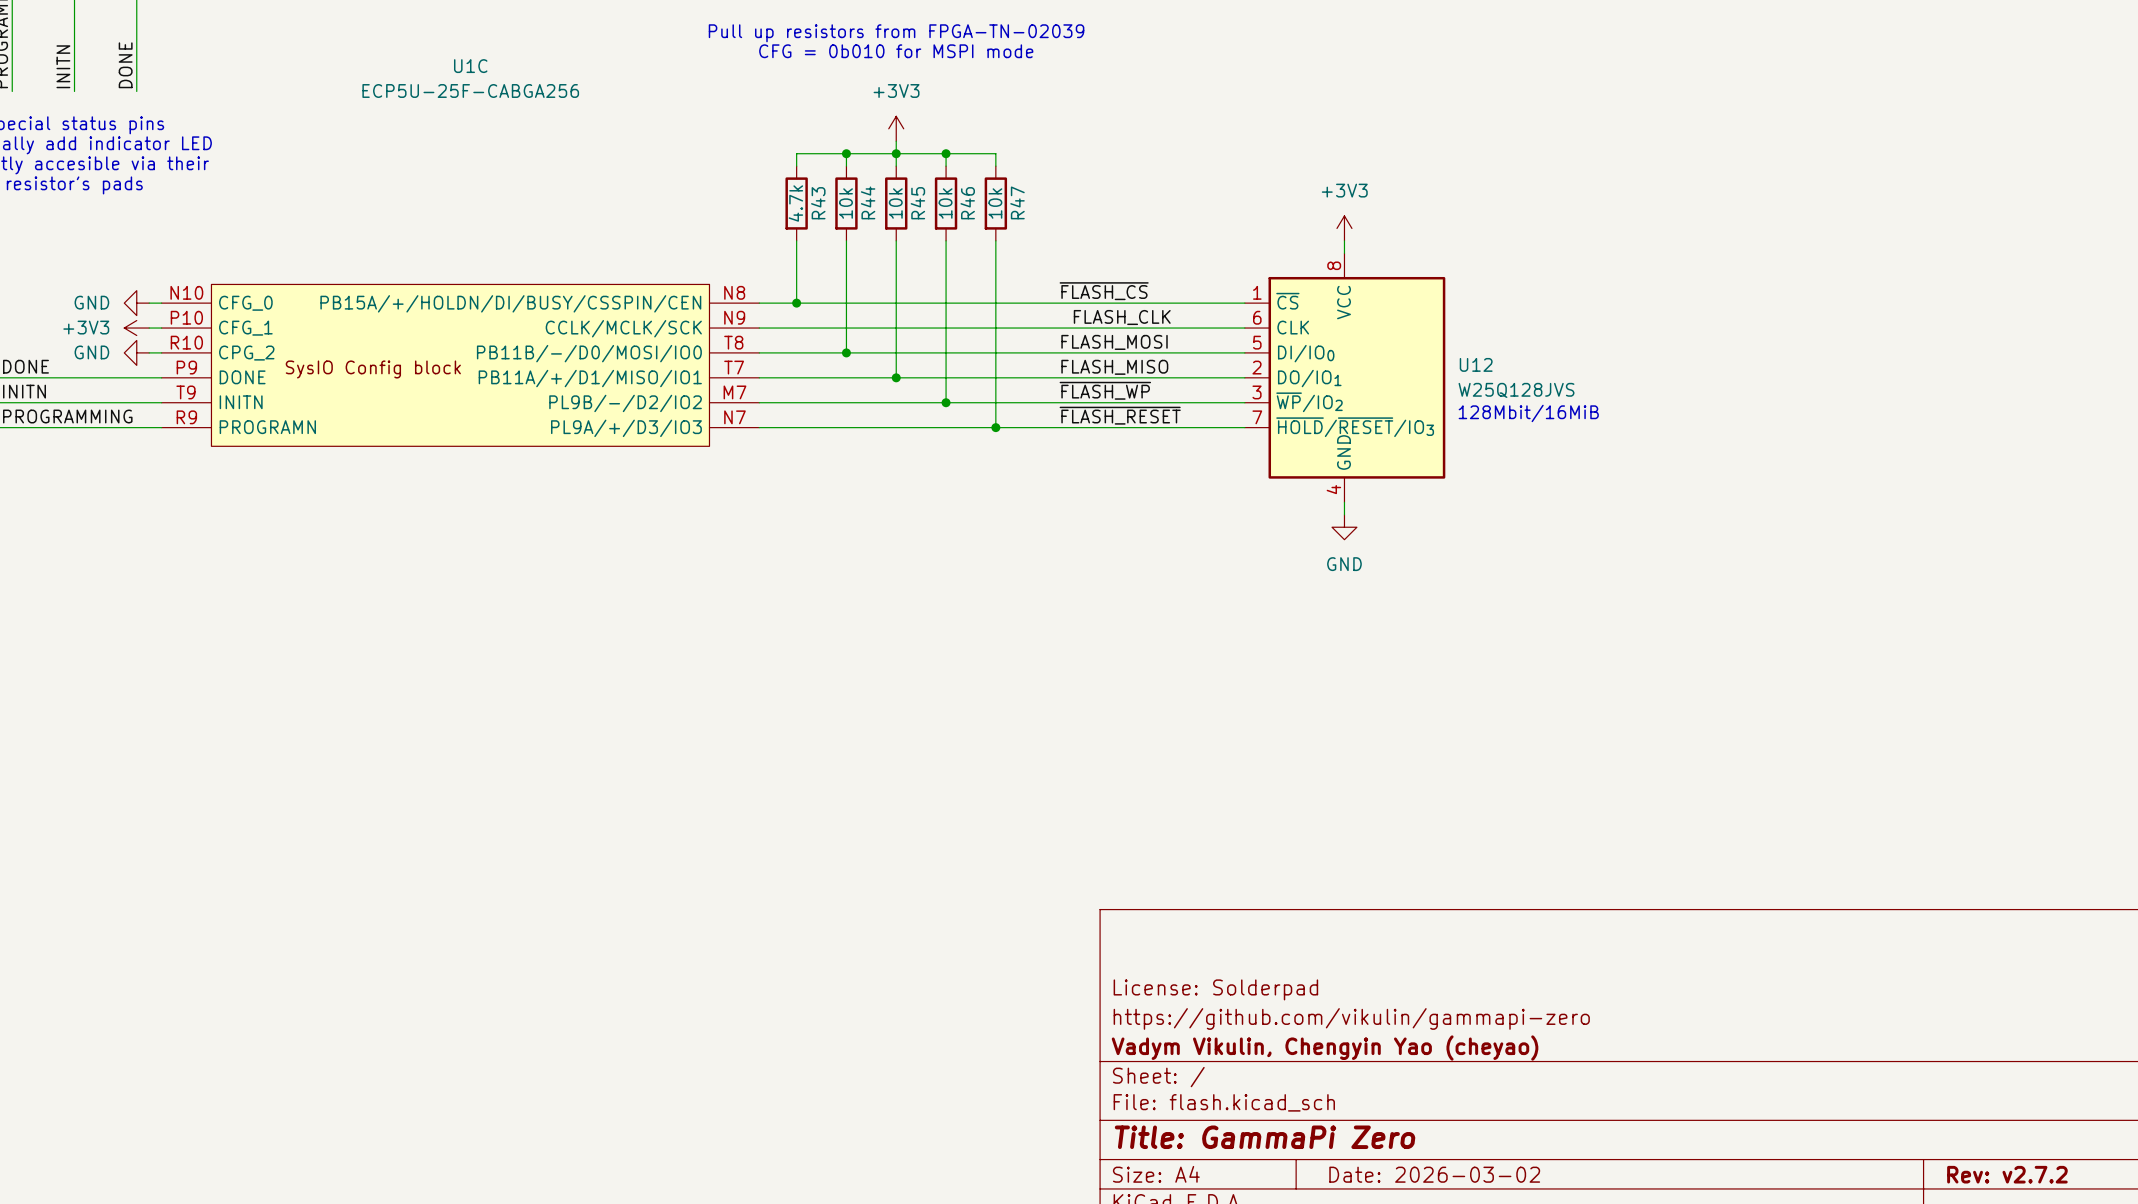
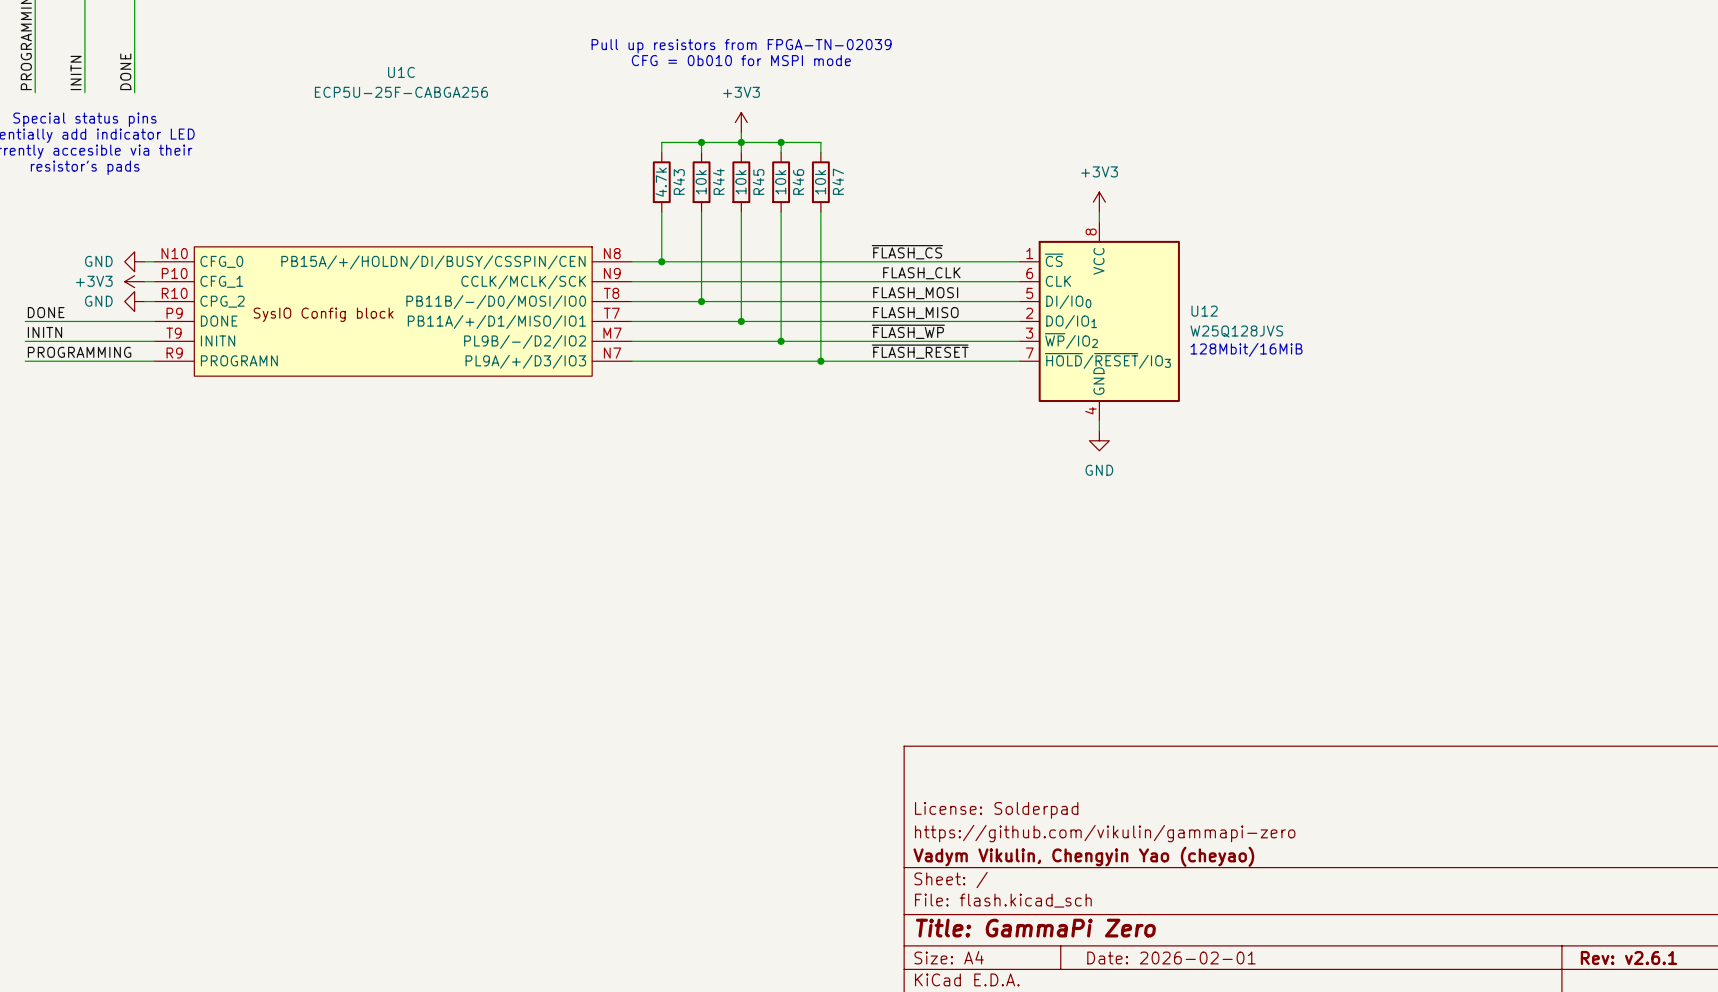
title block: Date: 2026-03-02 (1434, 1174) -> Date: 2026-02-01 (1171, 957)
title block: Rev: v2.7.2 (2007, 1174) -> Rev: v2.6.1 (1628, 957)

